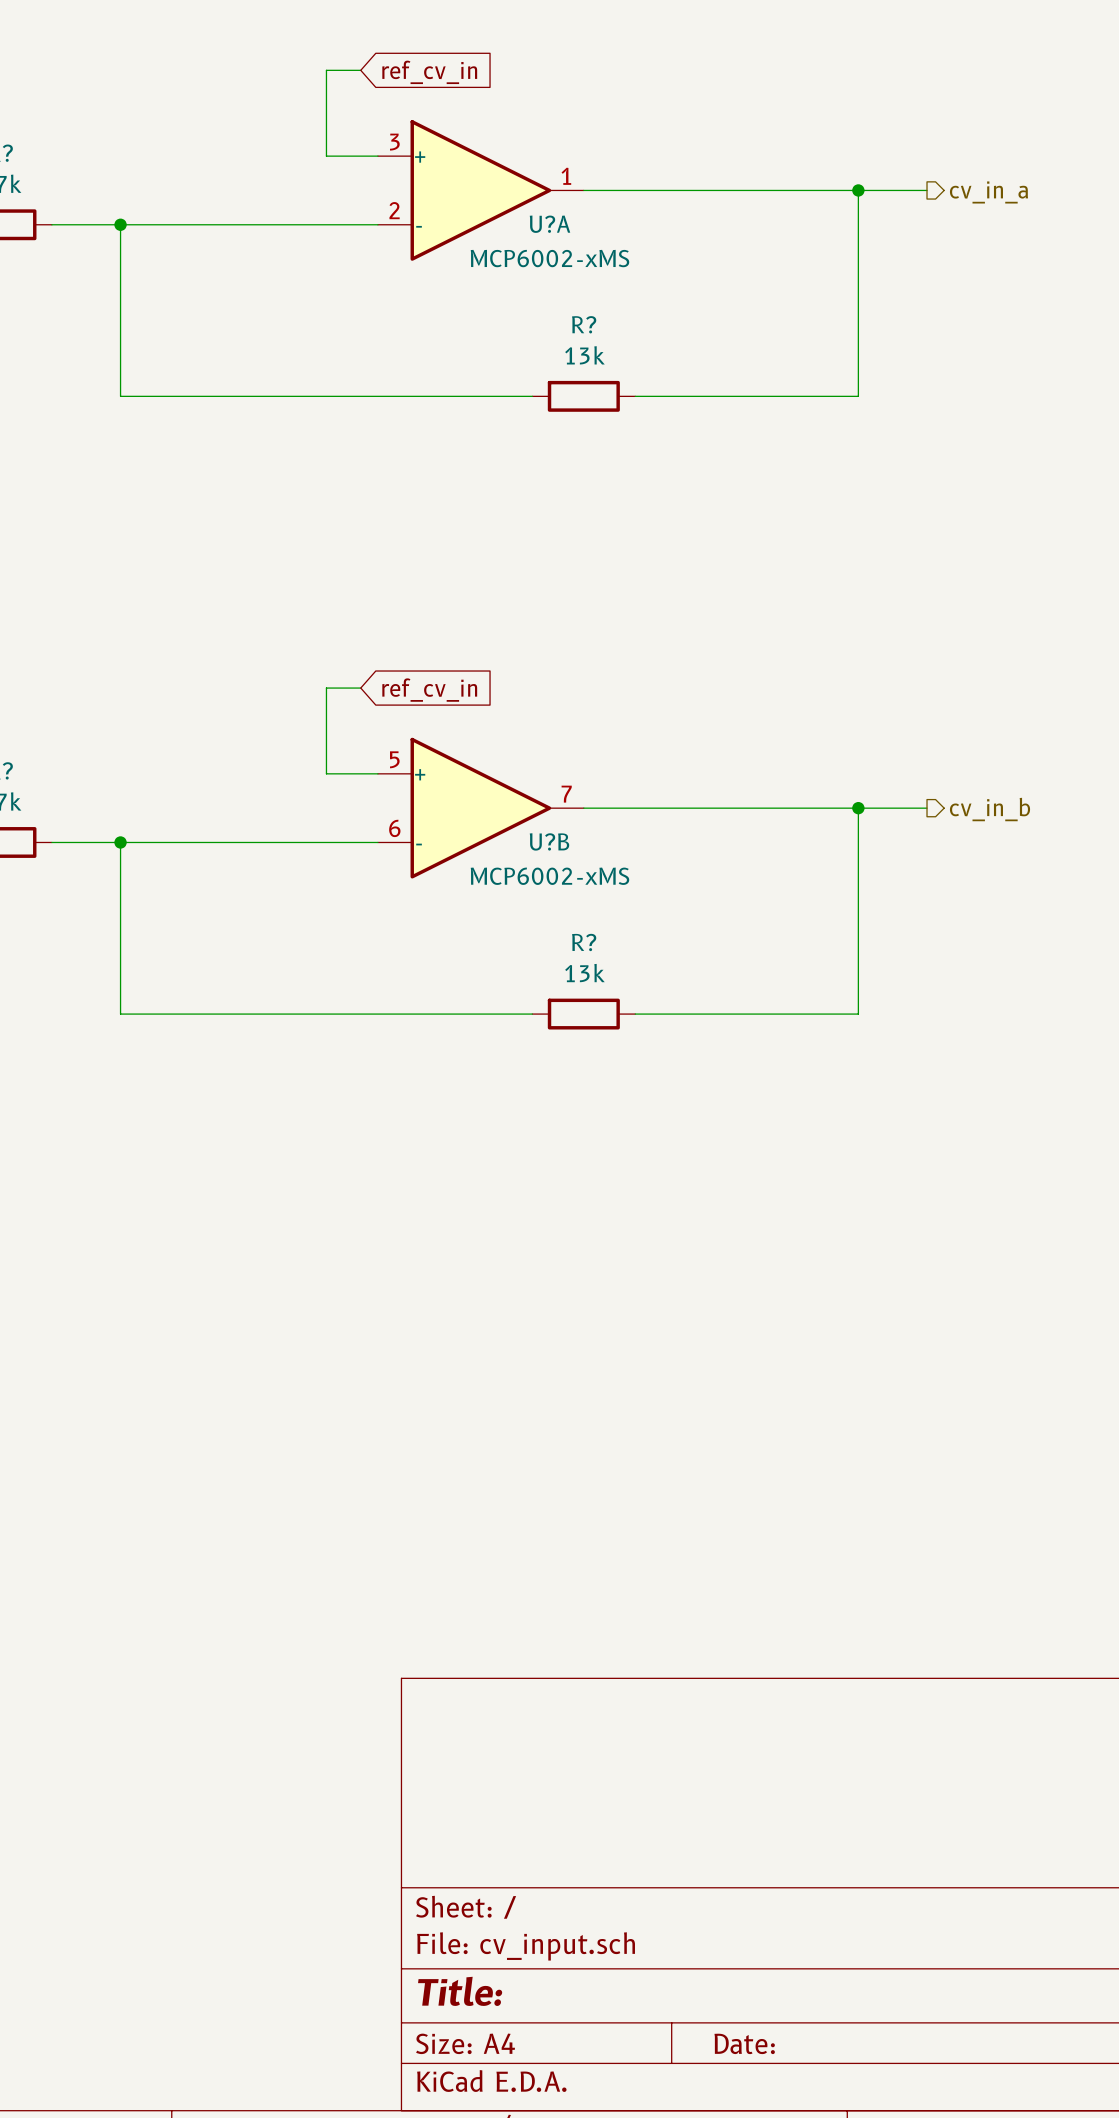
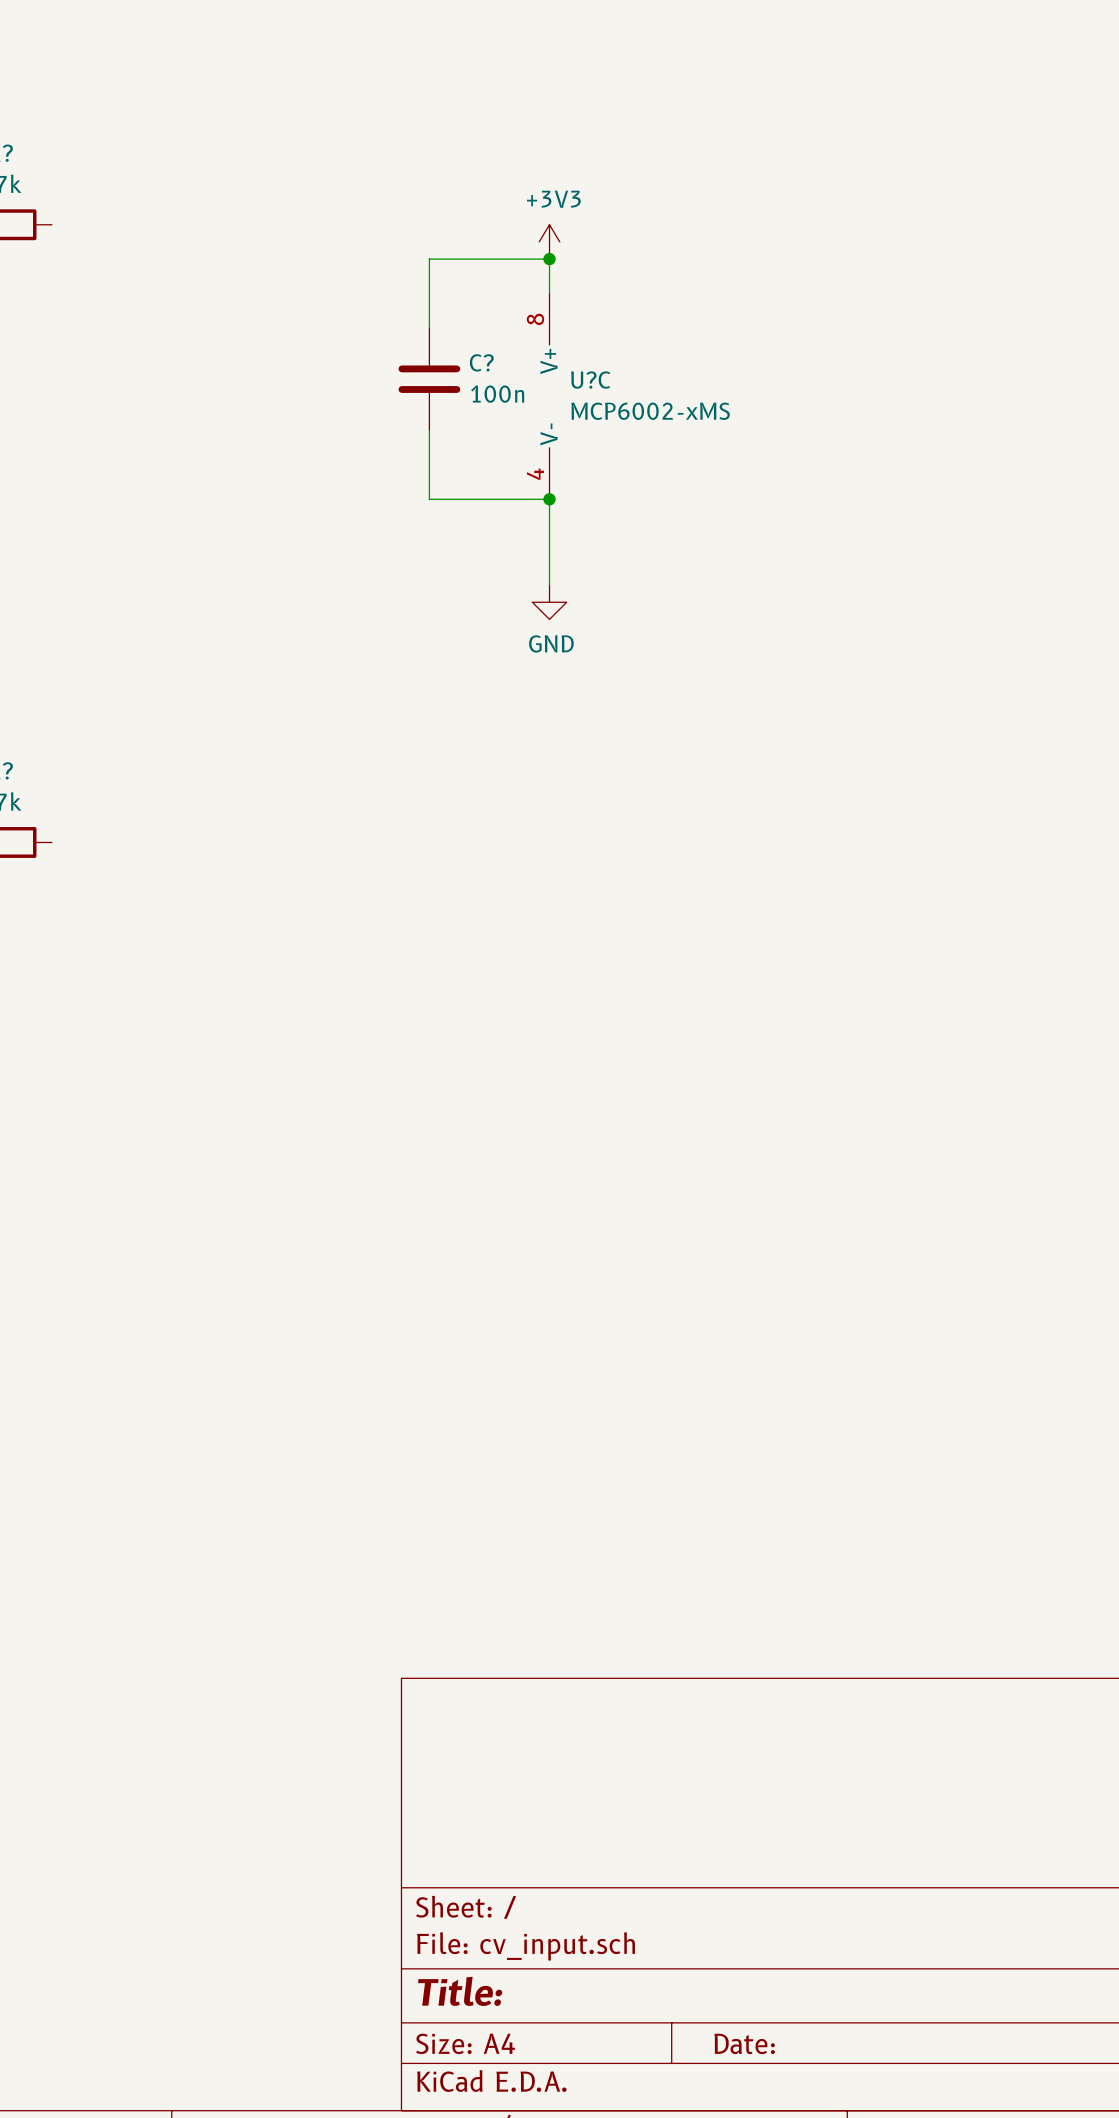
wire: (360, 70) (326, 70) (326, 156) (377, 156) -> none
global label: ref_cv_in (429, 72) -> none
U?A: MCP6002-xMS (480, 190) -> none
wire: (583, 190) (927, 190) -> none
wire: (858, 190) (858, 396) (635, 396) -> none
junction: (858, 190) -> none
hierarchical label: cv_in_a (988, 192) -> none
wire: (51, 224) (377, 224) -> none
wire: (120, 224) (120, 396) (532, 396) -> none
junction: (120, 224) -> none
power symbol: none -> +3V3 (549, 241)
junction: none -> (549, 259)
wire: none -> (549, 293) (549, 259) (429, 259) (429, 327)
C?: none -> 100n (429, 379)
U?C: none -> MCP6002-xMS (549, 396)
R?: 13k (583, 396) -> none
wire: none -> (429, 430) (429, 499) (549, 499) (549, 585)
junction: none -> (549, 499)
power symbol: none -> GND (549, 602)
wire: (360, 688) (326, 688) (326, 773) (377, 773) -> none
global label: ref_cv_in (429, 690) -> none
U?B: MCP6002-xMS (480, 808) -> none
wire: (583, 808) (927, 808) -> none
wire: (858, 808) (858, 1014) (635, 1014) -> none
junction: (858, 808) -> none
hierarchical label: cv_in_b (990, 809) -> none
wire: (51, 842) (377, 842) -> none
wire: (120, 842) (120, 1014) (532, 1014) -> none
junction: (120, 842) -> none
R?: 13k (583, 1014) -> none

